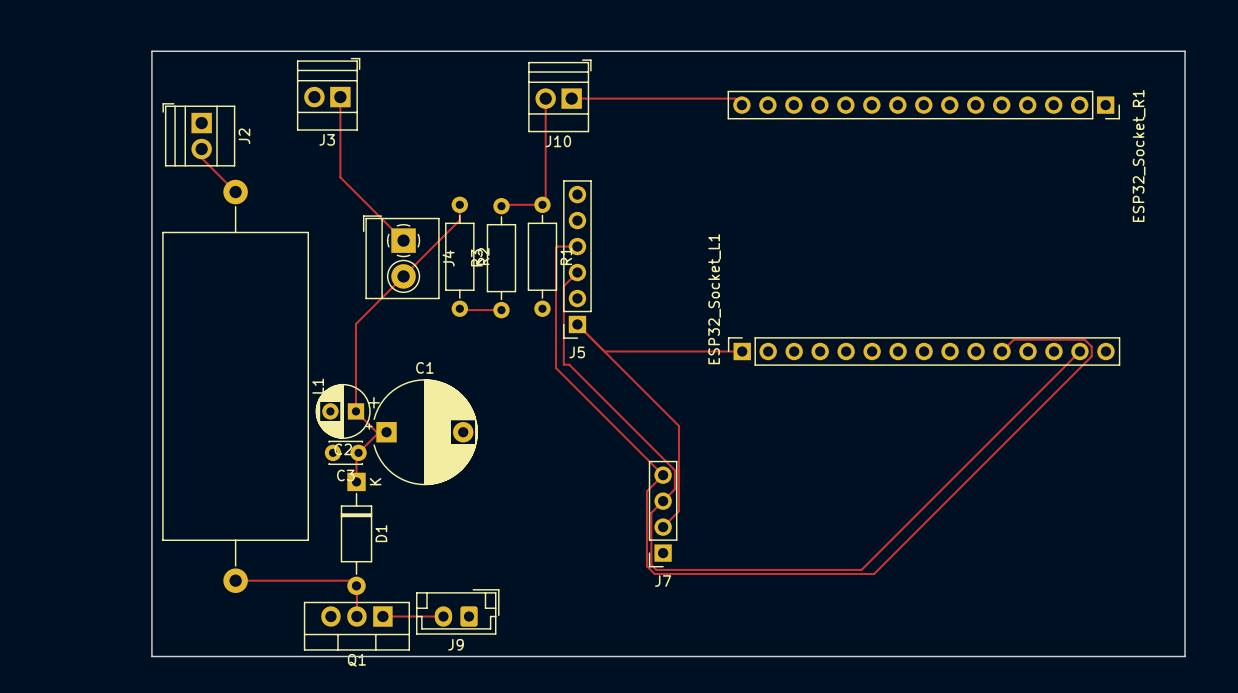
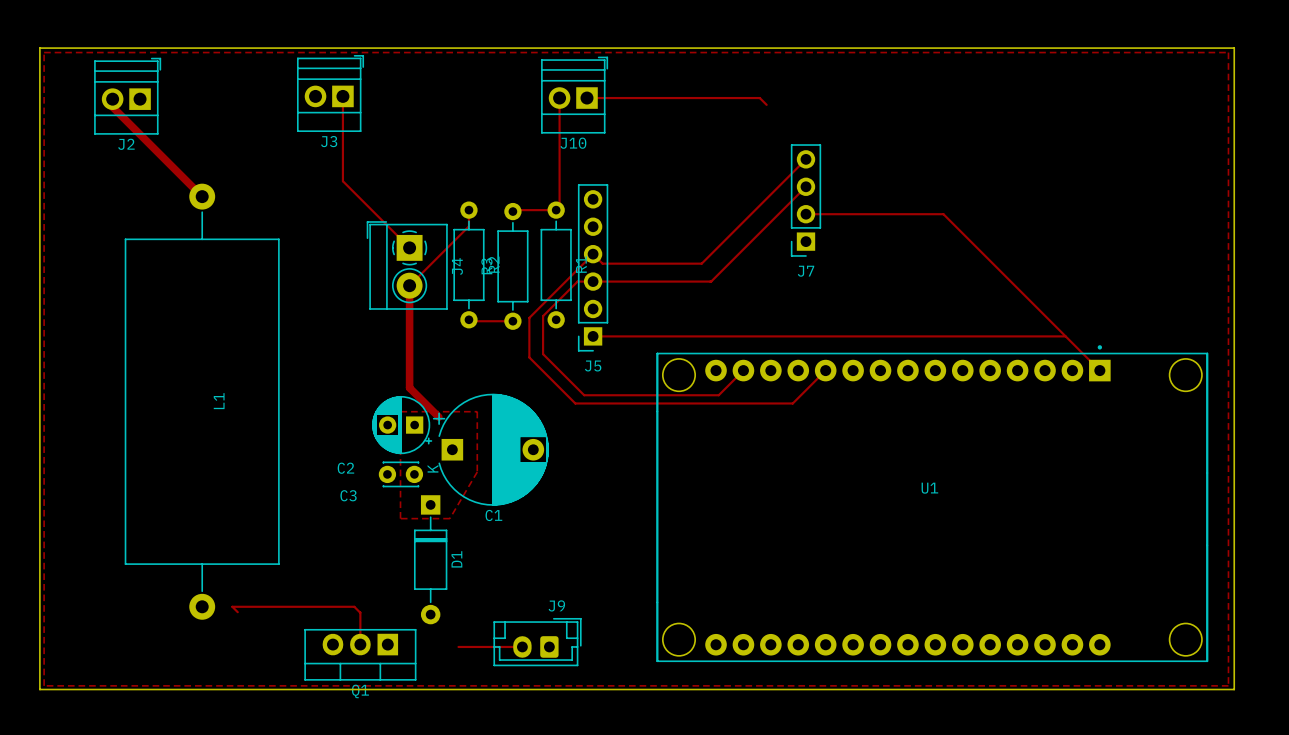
board edge: (151, 51) (151, 656) (1185, 656) -> (144, 48) (39, 48) (39, 689) (1234, 689) (1234, 686)
top zone outline: none -> (44, 52) (1228, 52) (1228, 685) (44, 685) (44, 52)
top track: none -> (112, 99) (112, 107) (202, 196)
ESP32_Socket_R1: (923, 105) -> none
J2 rotation: 0° (198, 134) -> 90° clockwise (127, 96)
J2 position: (198, 134) -> (127, 96)
top track: (201, 149) (201, 158) (235, 192) -> none
top track: none -> (806, 159) (701, 263) (602, 263) (593, 254) (529, 317) (529, 357) (575, 403) (792, 403) (825, 370)
top track: none -> (806, 186) (711, 281) (577, 281) (543, 316) (543, 354) (584, 395) (718, 395) (743, 370)
top track: none -> (806, 214) (943, 214) (1099, 370)
top track: (577, 246) (556, 247) (556, 368) (663, 475) (646, 491) (646, 566) (654, 574) (874, 574) (1091, 356) (1091, 346) (1084, 339) (1013, 339) (1002, 351) -> none
top track: (577, 272) (563, 286) (563, 364) (569, 364) (674, 470) (674, 489) (651, 512) (651, 564) (656, 569) (861, 569) (1079, 351) -> none
top track: (403, 276) (355, 324) (355, 411) (376, 432) (386, 432) -> (409, 285) (409, 387) (438, 417)
top track: (577, 324) (678, 426) (678, 511) (663, 527) -> (593, 336) (1065, 336)
top track: (604, 351) (742, 351) -> none
ESP32_Socket_L1: (924, 351) -> none
C1 name position: C1 (424, 367) -> C1 (493, 515)
L1 position: (235, 386) -> (202, 401)
L1 name position: L1 (318, 386) -> L1 (219, 401)
top zone outline: none -> (400, 411) (400, 518) (449, 518) (477, 472) (477, 411) (400, 411)
C2 position: (344, 411) -> (402, 425)
top track: (379, 432) (356, 454) (356, 481) -> none
C1 position: (423, 432) -> (490, 449)
C3 position: (345, 452) -> (400, 474)
D1 text position: K (375, 481) -> K (433, 468)
U1: none -> (932, 503)
J7 position: (663, 514) -> (806, 200)
D1 position: (356, 533) -> (430, 559)
J9 position: (457, 611) -> (537, 642)
top track: (382, 616) (443, 616) -> (458, 646) (522, 646)
J9 name position: J9 (455, 644) -> J9 (556, 605)

